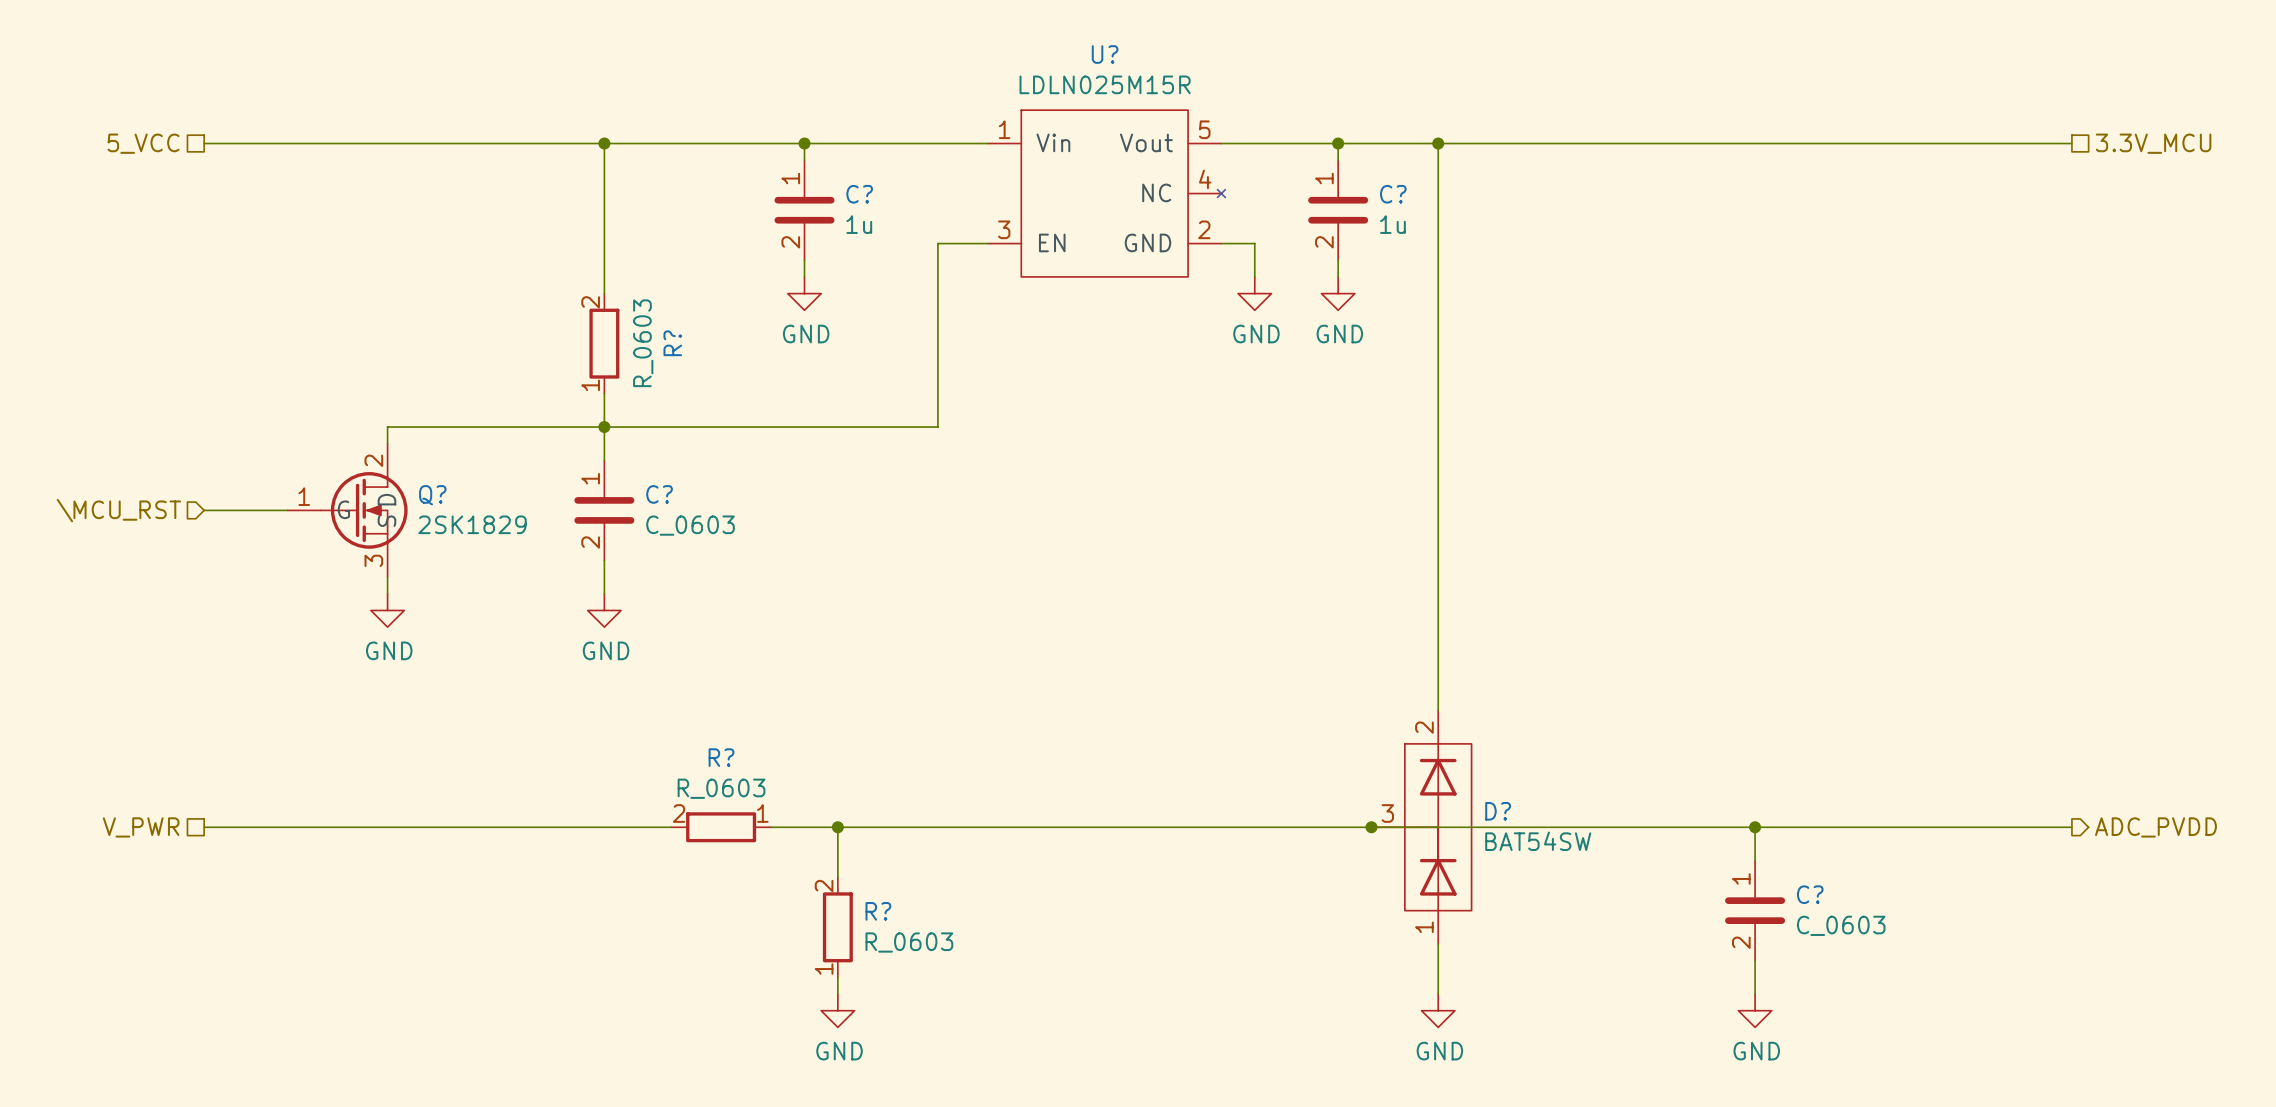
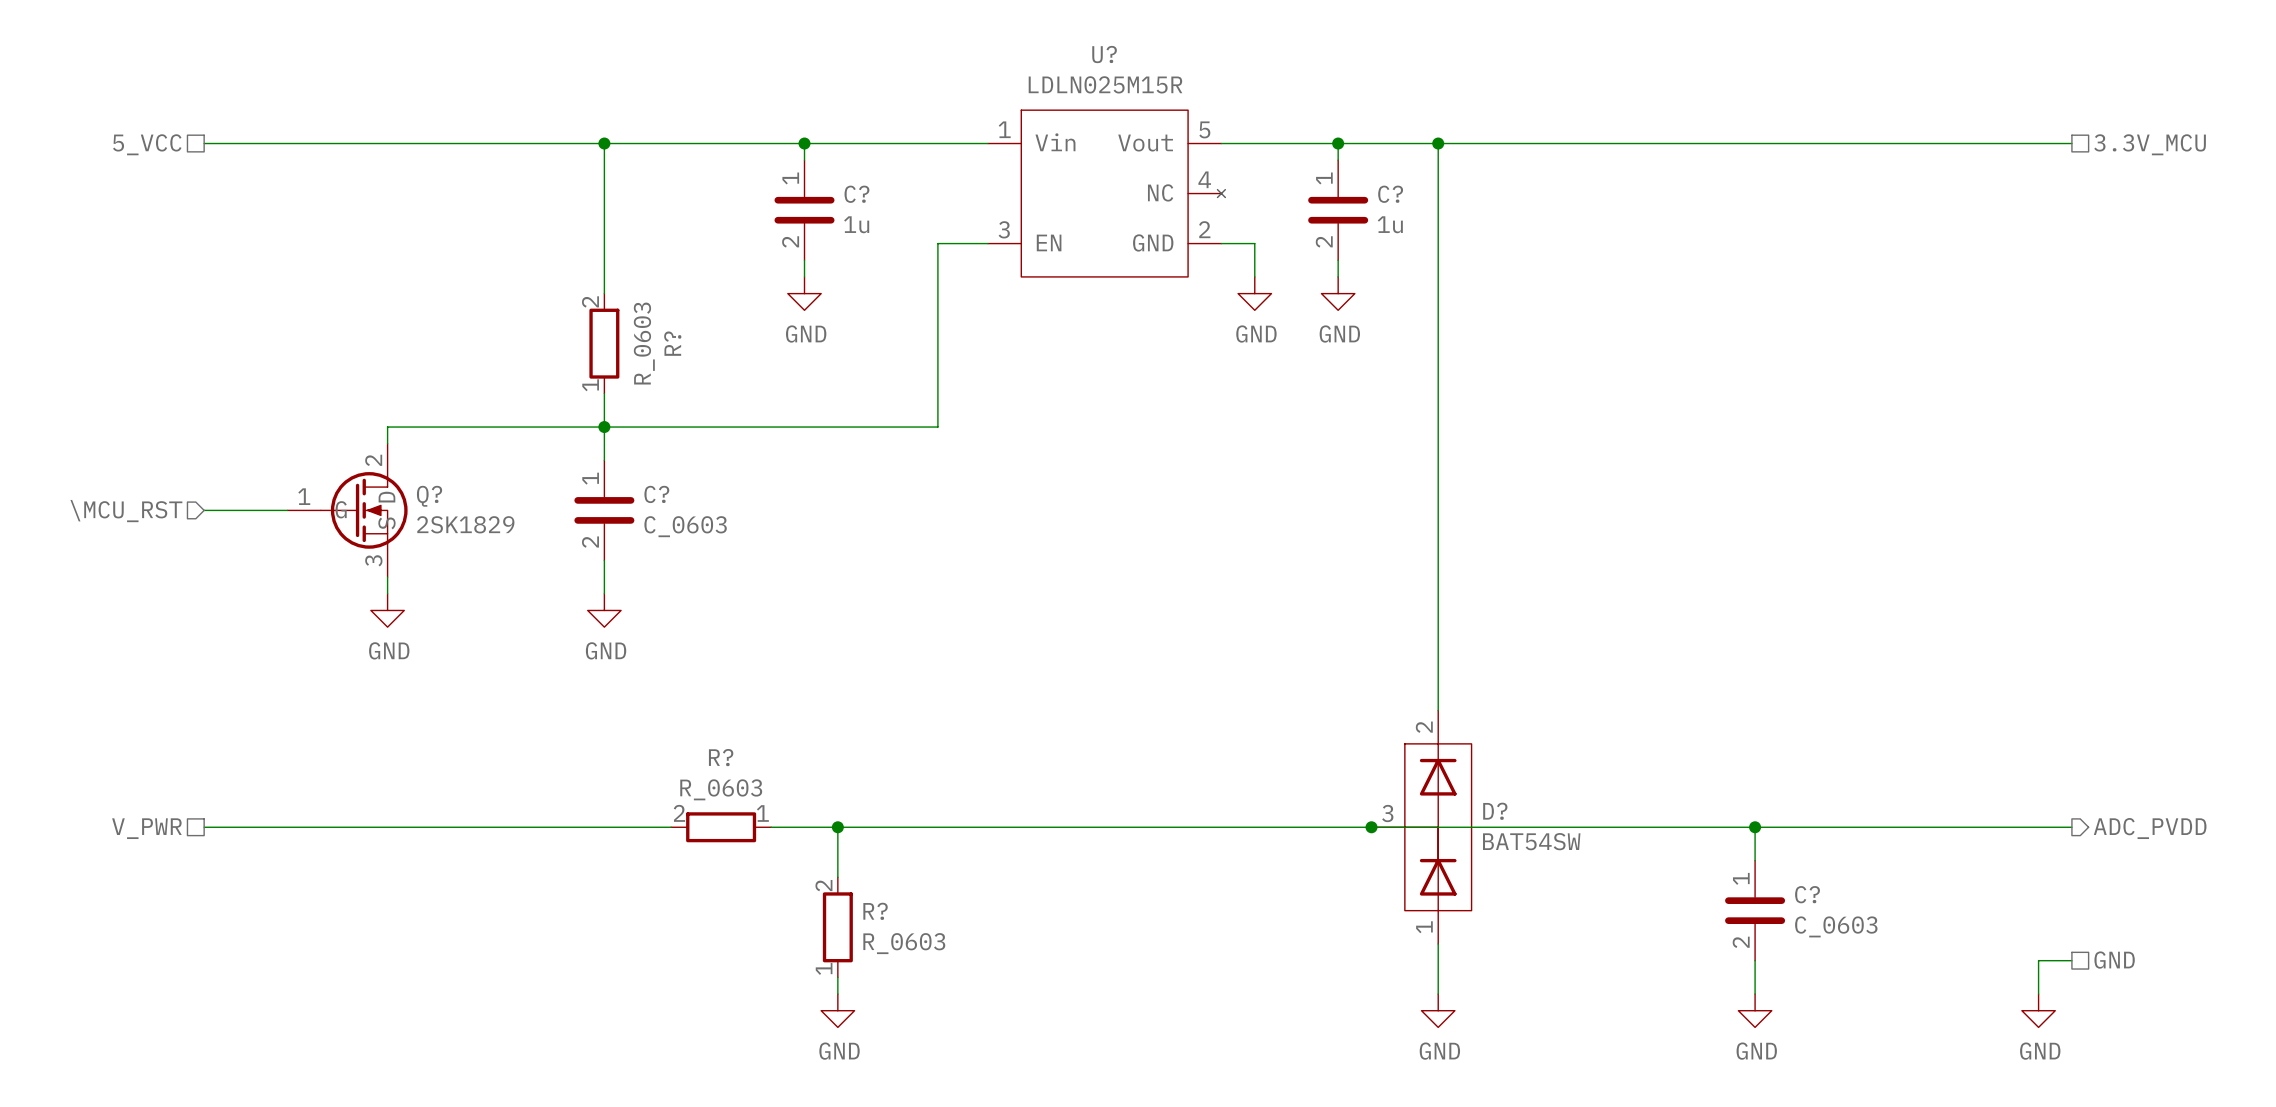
wire: none -> (2071, 960) (2038, 960) (2038, 994)
hierarchical label: none -> GND (2114, 960)
power symbol: none -> GND (2038, 1010)

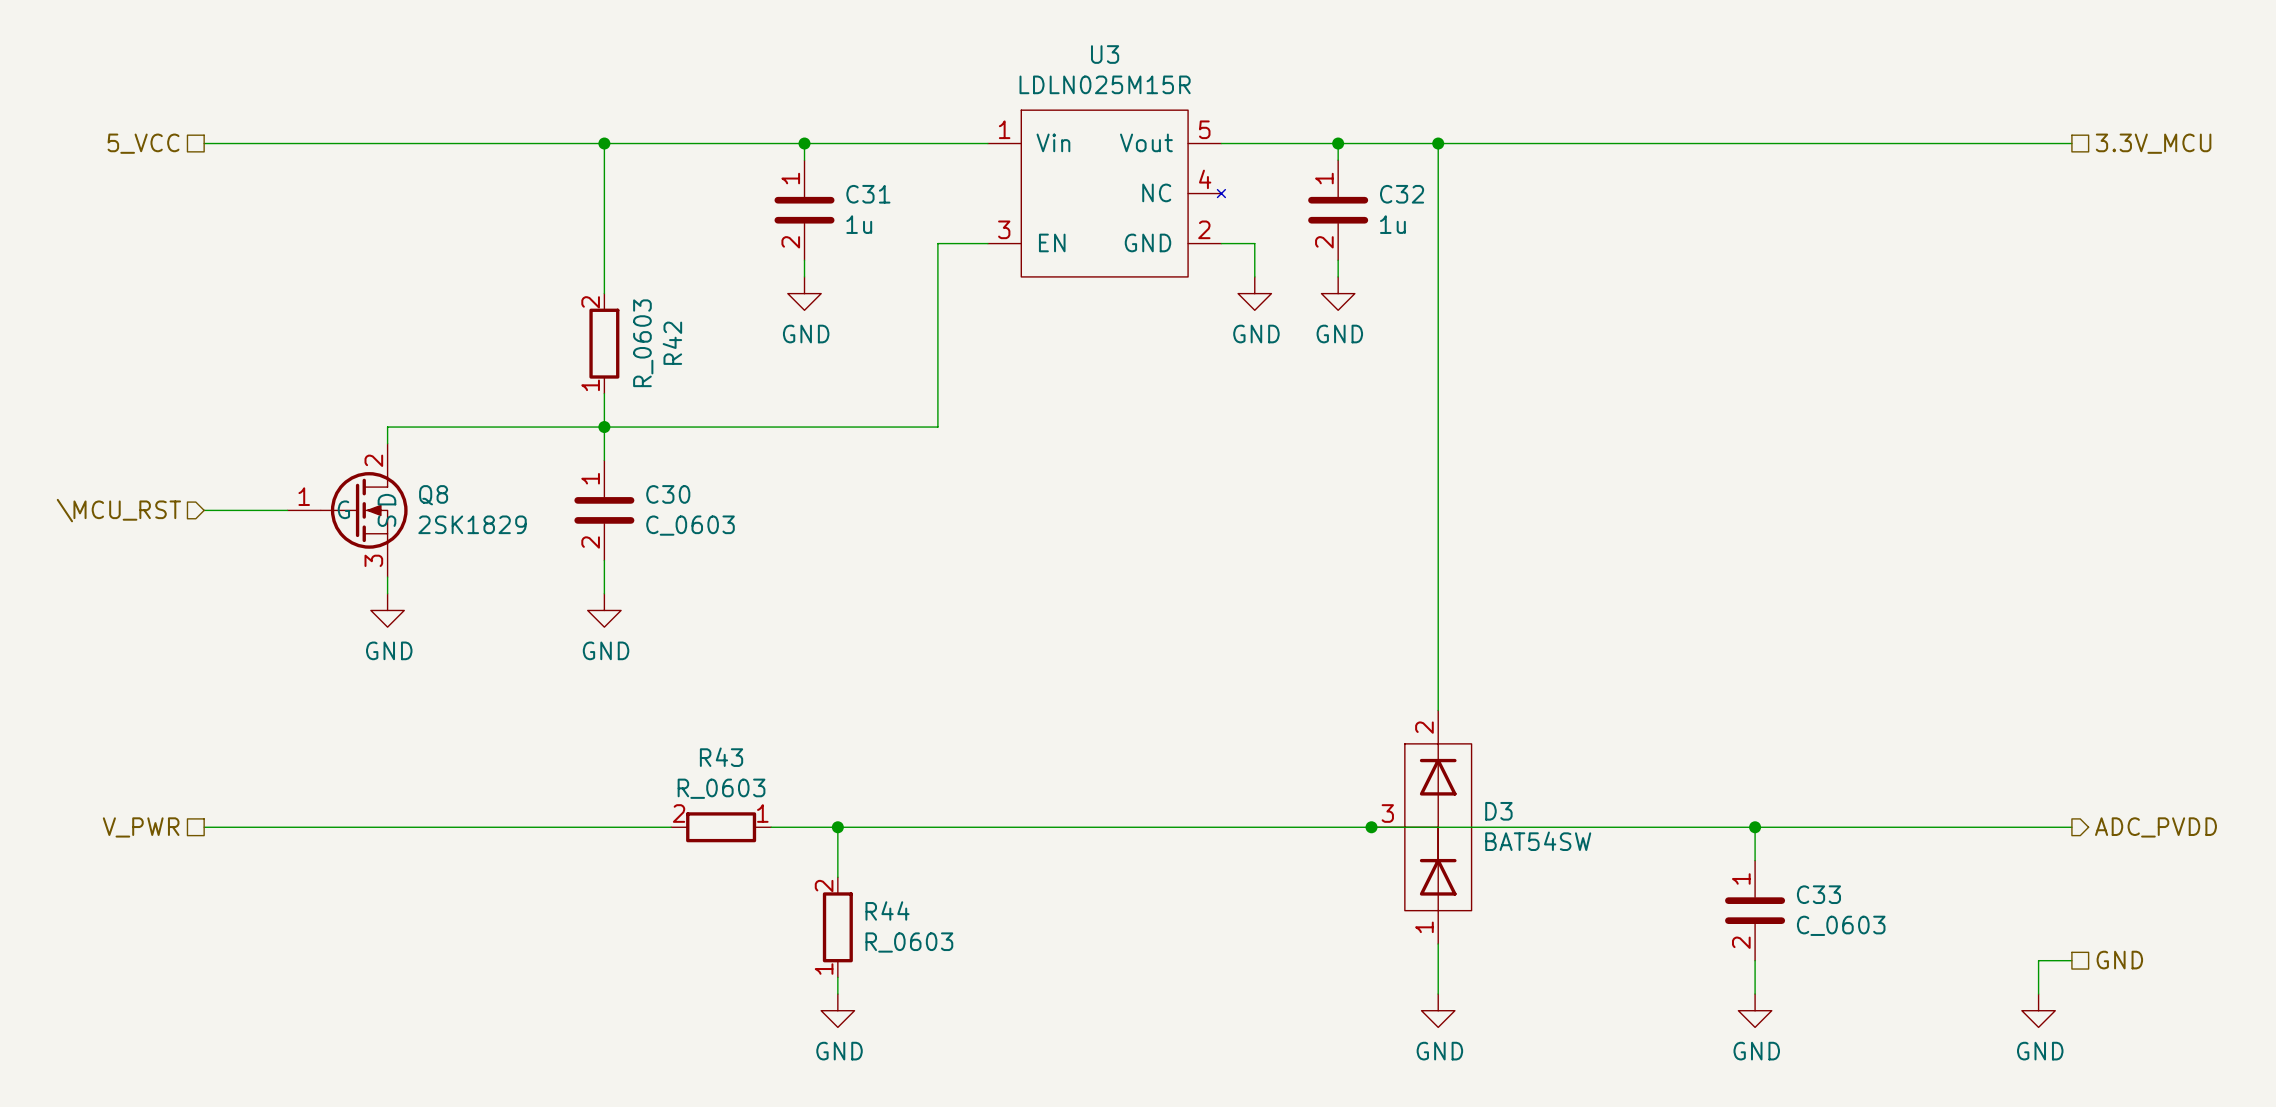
U? name: U? (1104, 54) -> U3 (1105, 54)
C? name: C? (856, 194) -> C31 (868, 194)
C? name: C? (1390, 194) -> C32 (1402, 194)
R? name: R? (672, 343) -> R42 (672, 343)
C? name: C? (656, 494) -> C30 (668, 494)
Q? name: Q? (429, 496) -> Q8 (433, 495)
R? name: R? (721, 757) -> R43 (721, 757)
D? name: D? (1495, 811) -> D3 (1498, 811)
C? name: C? (1807, 894) -> C33 (1818, 894)
R? name: R? (875, 911) -> R44 (887, 910)

